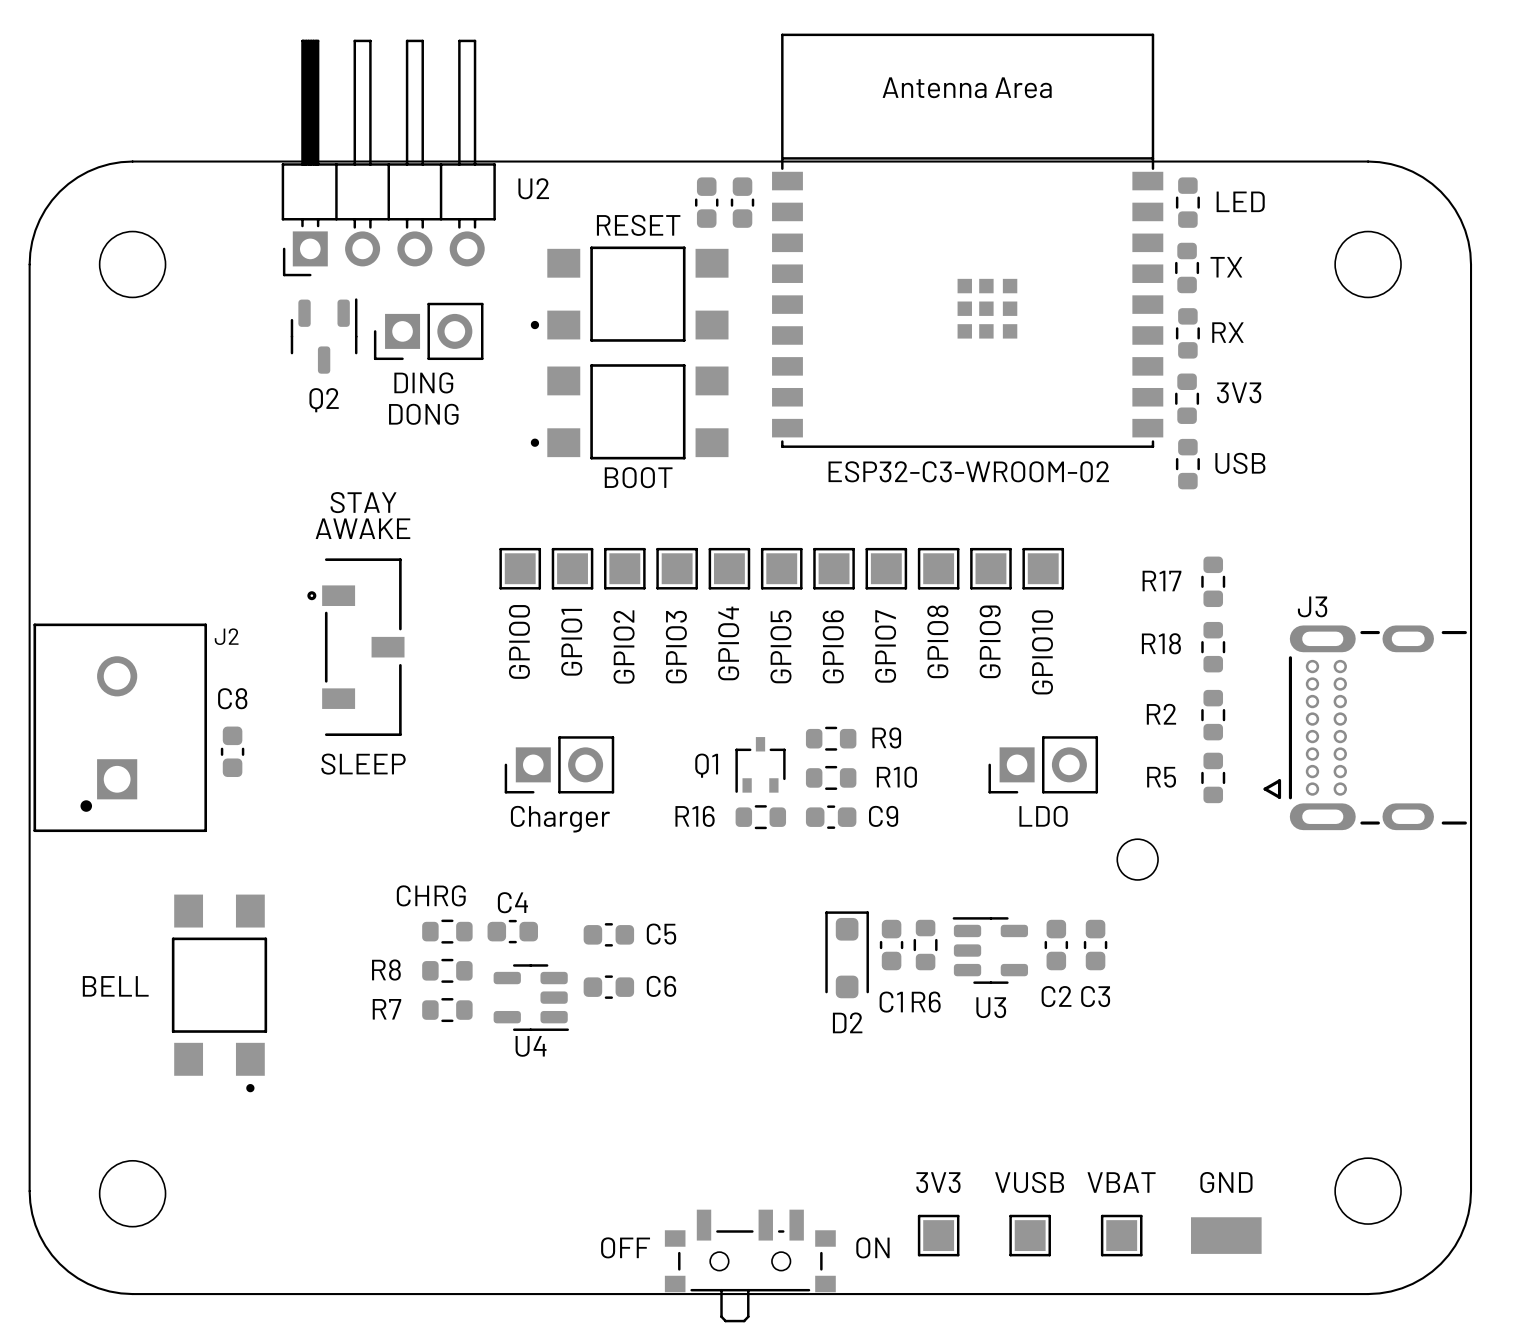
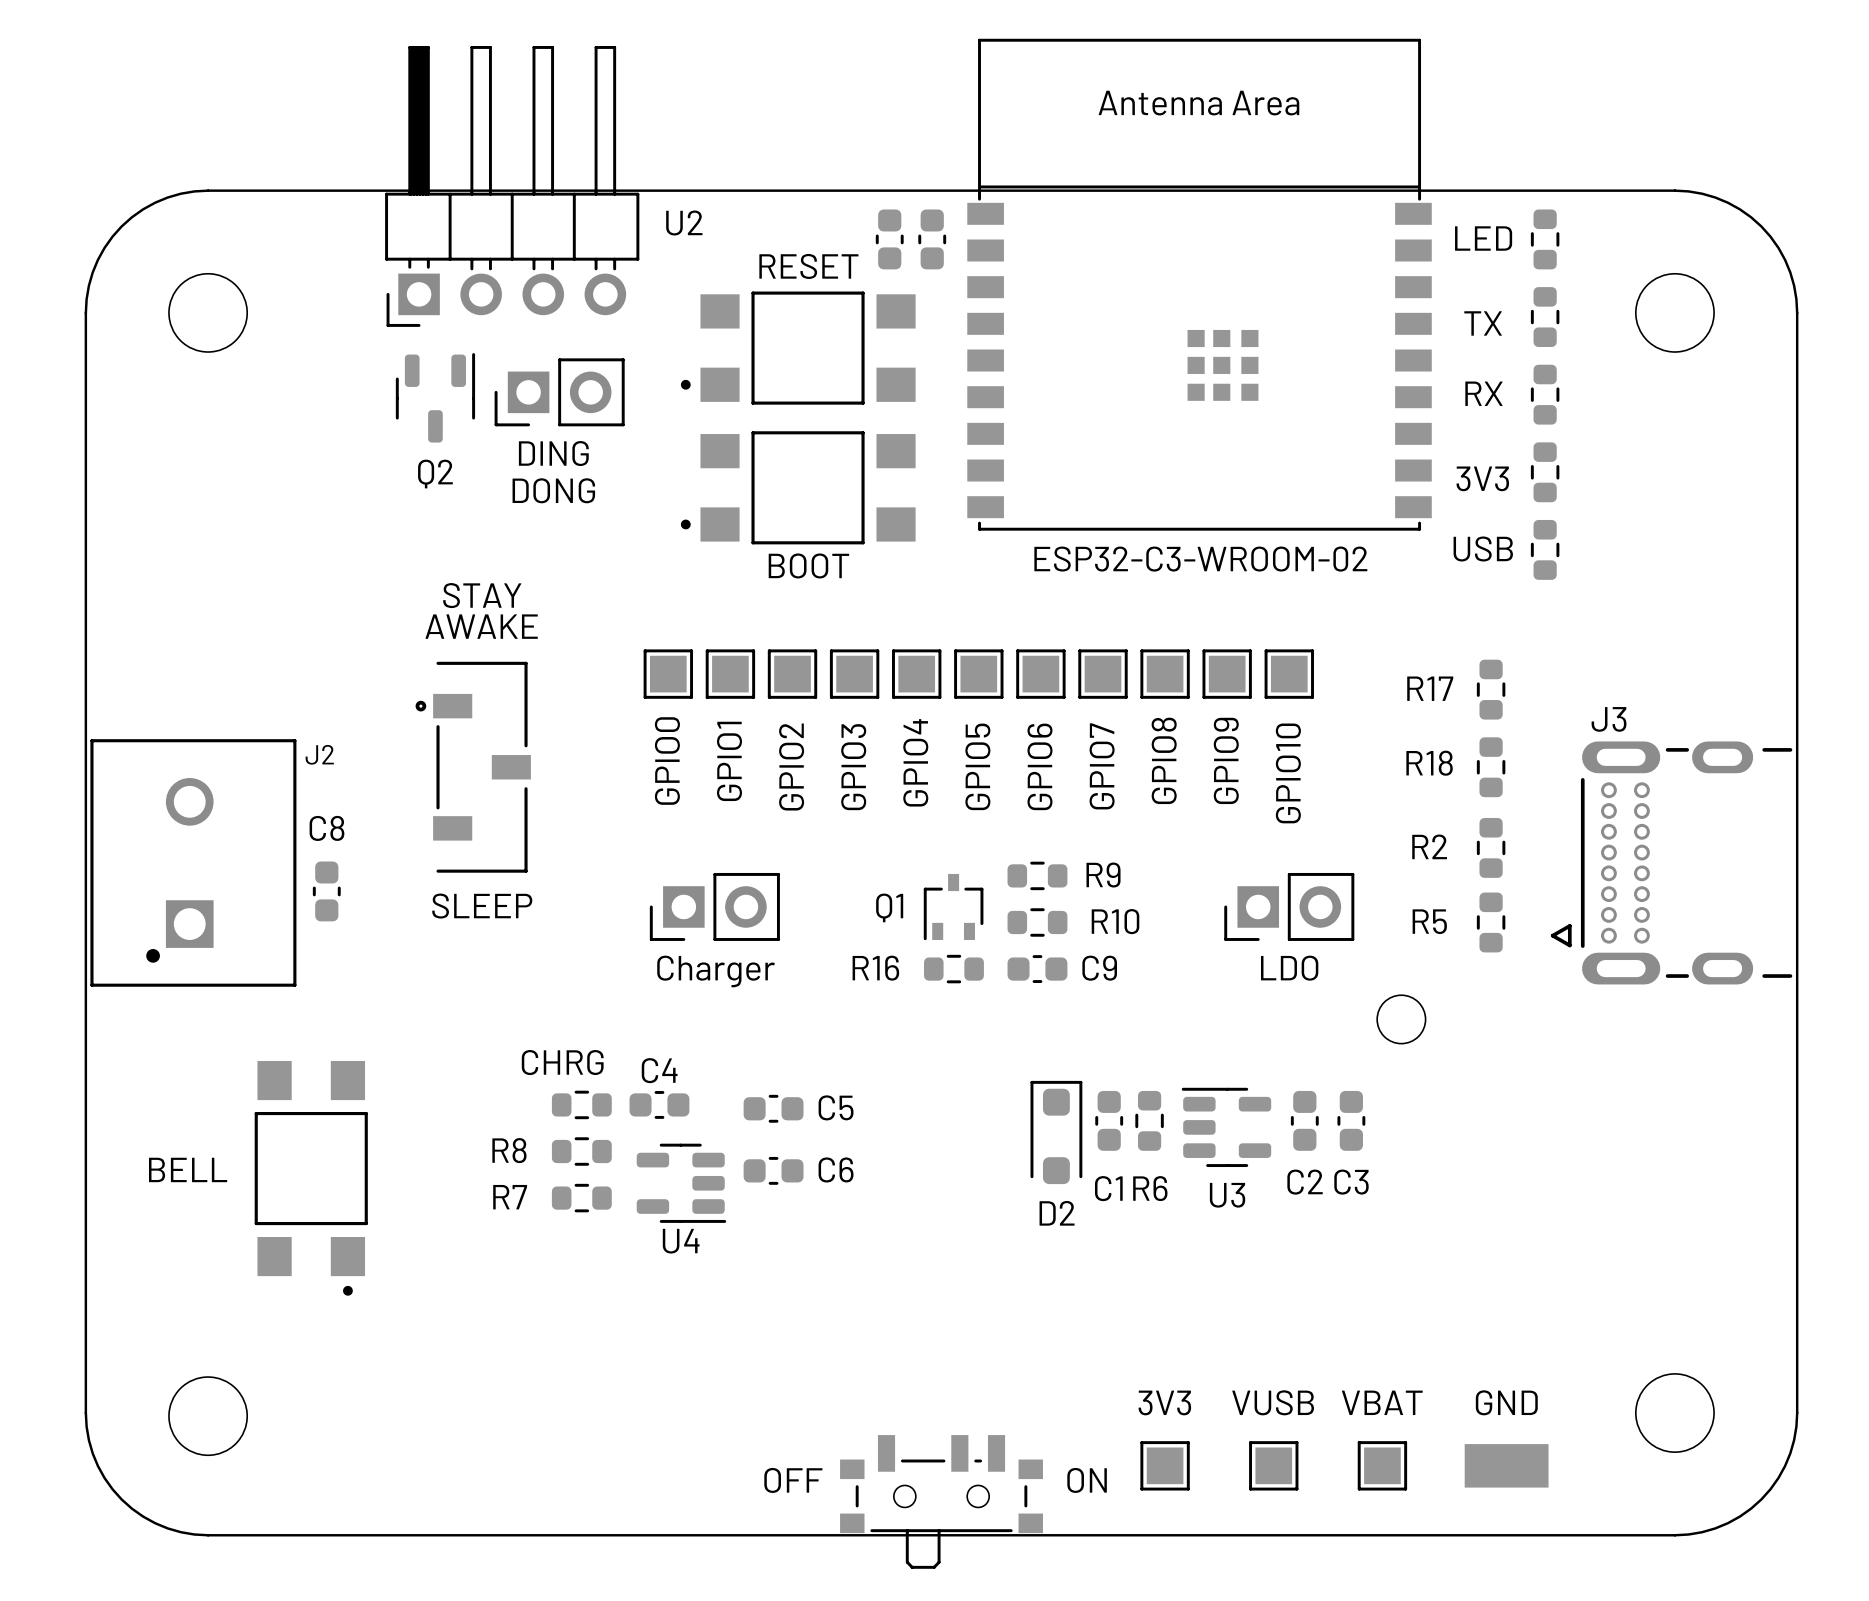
part rotation: 0° (1187, 202) -> 180° (1545, 239)
part position: (1187, 202) -> (1545, 239)
part: (1187, 267) -> none
part: none -> (1545, 317)
part: (1187, 333) -> none
part: none -> (1545, 394)
part: (1187, 398) -> none
part: none -> (1545, 472)
part rotation: 0° (1187, 464) -> 180° (1545, 549)
part position: (1187, 464) -> (1545, 549)

